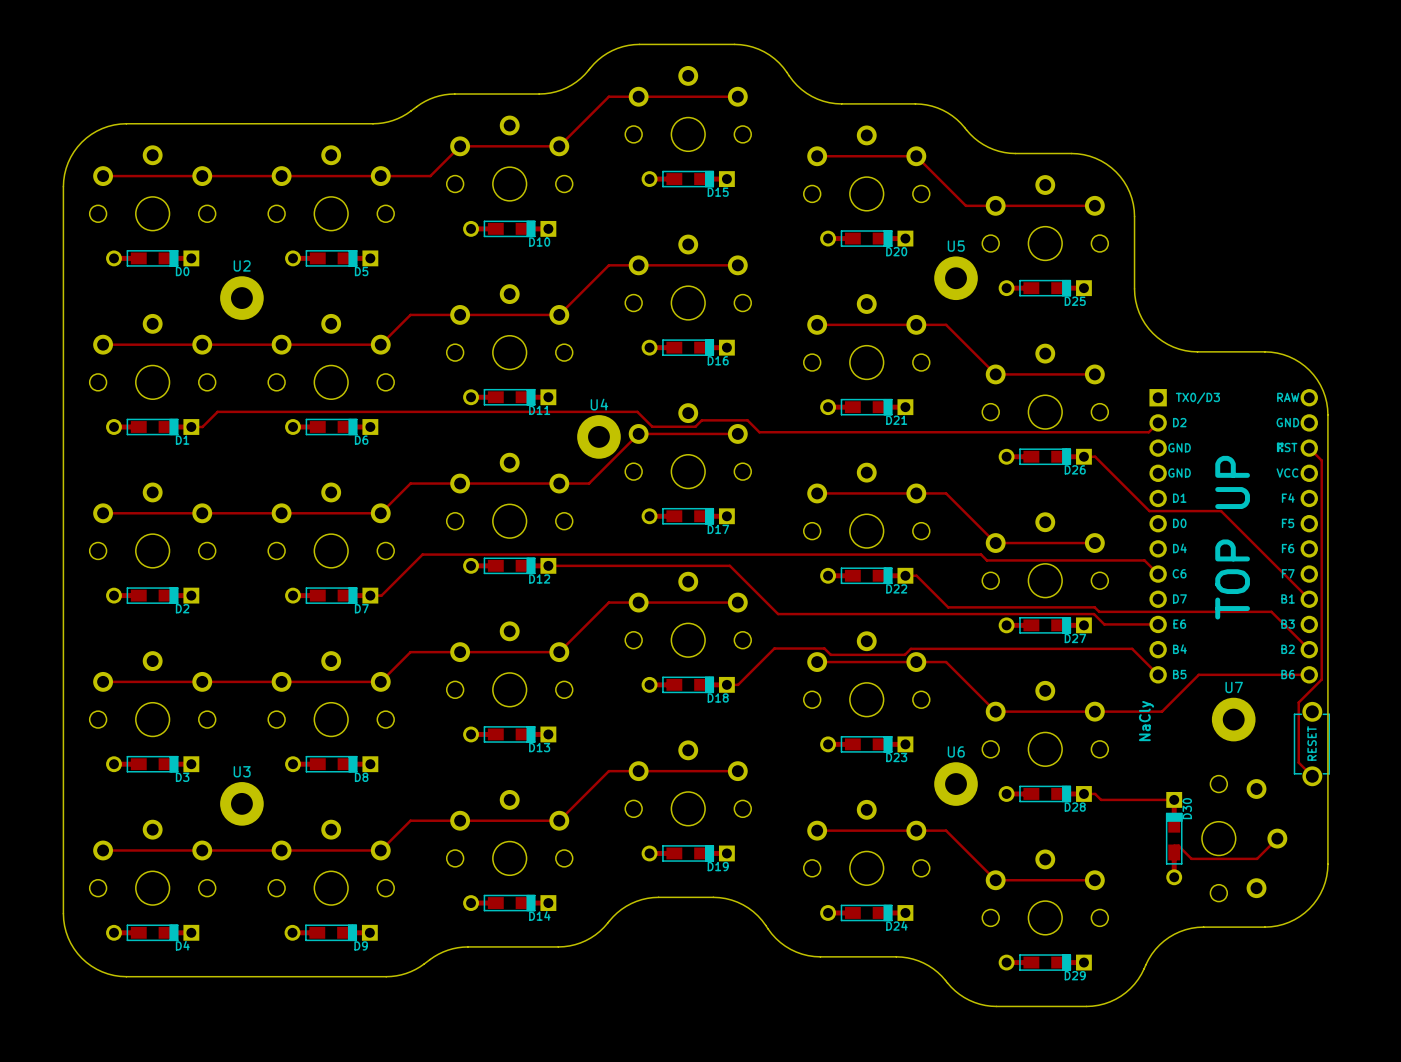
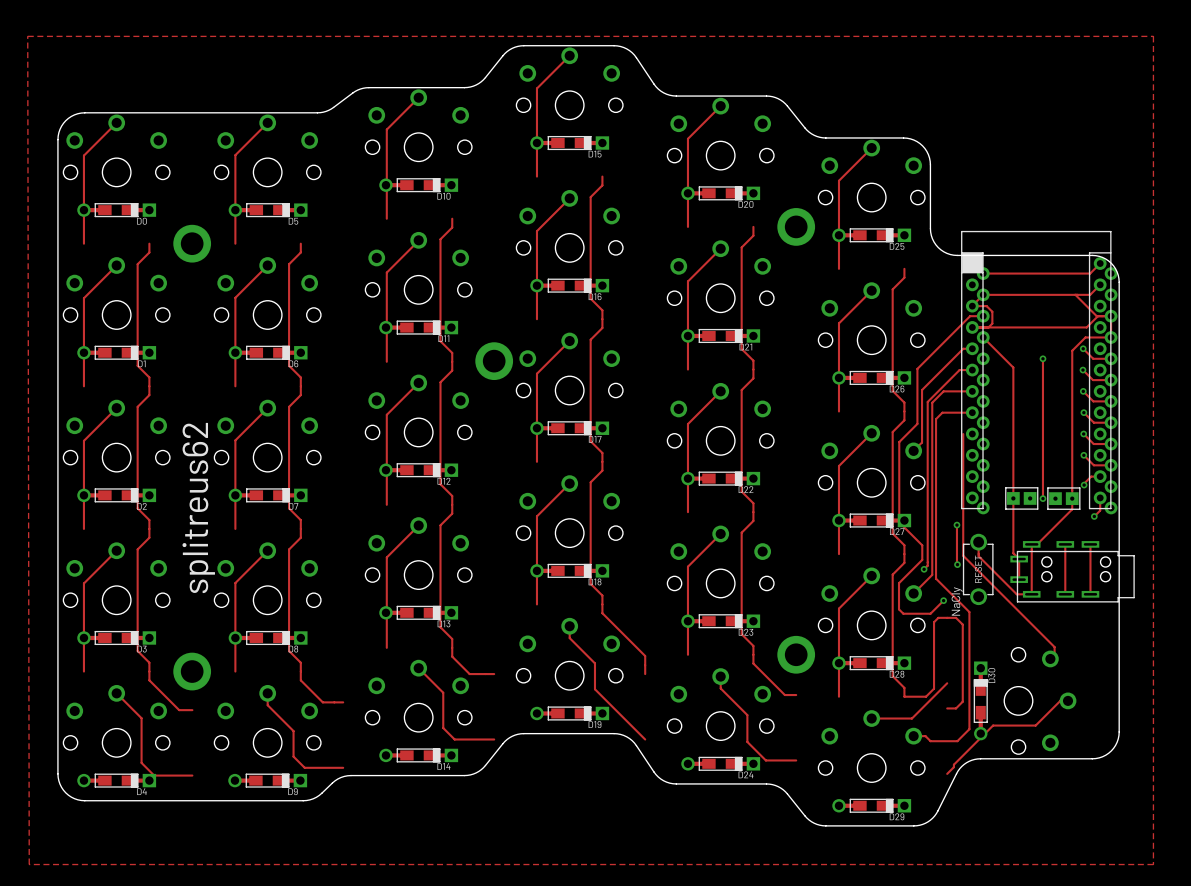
board edge: (734, 44) (752, 47) (769, 55) (783, 67) (797, 85) (817, 99) (835, 103) (915, 103) (932, 106) (952, 115) (983, 144) (998, 151) (1015, 153) -> none
board edge: (734, 44) (628, 45) (607, 53) (576, 82) (556, 91) (539, 94) (444, 94) (430, 99) (402, 116) (383, 122) (114, 124) (91, 134) (77, 146) (66, 168) (63, 186) -> none
zone outline: none -> (27, 36) (1153, 36) (1153, 864) (29, 864) (27, 36)
board edge: none -> (523, 45) (620, 46) (634, 55) (655, 86) (666, 94) (676, 96) (772, 96) (785, 103) (806, 130) (817, 136) (903, 137) (913, 140) (924, 148) (929, 157) (930, 232) (934, 242) (943, 251) (957, 255) (1095, 255) (1105, 259) (1113, 265) (1119, 282) (1119, 731) (1115, 745) (1108, 753) (1092, 758) (971, 760) (958, 771) (934, 816) (925, 823) (913, 825) (817, 824) (806, 818) (785, 791) (772, 784) (669, 783) (655, 774) (632, 740) (623, 735) (614, 733) (517, 734) (504, 741) (483, 767) (473, 774) (347, 775) (335, 780) (316, 797) (306, 800) (84, 800) (71, 797) (63, 790) (57, 773) (57, 139) (61, 126) (71, 116) (81, 113) (320, 112) (331, 109) (355, 91) (363, 88) (470, 86) (483, 79) (507, 51) (515, 47) (523, 45)
track: none -> (569, 55) (536, 88) (536, 176)
track: (737, 96) (608, 96) (559, 146) (460, 146) (430, 176) (103, 176) -> none
track: none -> (418, 97) (386, 129) (386, 218)
track: none -> (720, 106) (687, 138) (687, 226)
board edge: (1015, 153) (1083, 154) (1101, 160) (1116, 171) (1127, 186) (1133, 204) (1134, 295) (1139, 312) (1148, 328) (1162, 341) (1179, 349) (1197, 351) -> none
track: none -> (116, 122) (83, 155) (83, 243)
track: none -> (267, 122) (235, 155) (235, 243)
track: (817, 156) (916, 156) (965, 205) (1094, 205) -> none
track: none -> (871, 148) (838, 180) (838, 268)
board edge: (63, 186) (63, 913) (68, 937) (77, 953) (86, 962) (102, 971) (120, 976) (391, 976) (406, 973) (424, 964) -> none
track: none -> (602, 176) (602, 185) (590, 197) (590, 298) (602, 310) (602, 328) (590, 339) (590, 441) (602, 453) (602, 470) (590, 482) (590, 583) (602, 595) (602, 613) (645, 656) (645, 674)
track: none -> (569, 198) (536, 231) (536, 319)
track: (737, 265) (608, 265) (559, 314) (410, 314) (380, 344) (103, 344) -> none
track: none -> (452, 218) (452, 227) (440, 239) (440, 341) (452, 352) (452, 370) (440, 382) (440, 484) (452, 496) (452, 513) (440, 525) (440, 627) (452, 639) (452, 656) (469, 674) (494, 674)
track: none -> (753, 226) (753, 235) (741, 247) (741, 348) (753, 360) (753, 378) (741, 390) (741, 491) (753, 503) (753, 520) (741, 532) (741, 634) (753, 645) (753, 663) (784, 695) (796, 695)
U5: (956, 278) -> none
part: none -> (796, 226)
track: none -> (418, 240) (386, 272) (386, 361)
track: none -> (149, 243) (149, 252) (137, 264) (137, 365) (149, 377) (149, 395) (137, 406) (137, 508) (149, 520) (149, 537) (137, 549) (137, 650) (149, 662) (149, 680) (179, 710) (192, 710)
U2: (241, 298) -> none
part: none -> (192, 243)
track: none -> (300, 243) (300, 252) (289, 264) (289, 365) (300, 377) (300, 395) (289, 406) (289, 508) (300, 520) (300, 537) (289, 549) (289, 650) (300, 662) (300, 680) (322, 702) (343, 702)
track: none -> (720, 248) (687, 281) (687, 369)
track: none -> (1100, 263) (1090, 273) (983, 273)
track: none -> (116, 265) (83, 298) (83, 386)
track: none -> (267, 265) (235, 297) (235, 386)
track: (817, 324) (946, 324) (995, 374) (1094, 374) -> none
track: none -> (904, 268) (904, 277) (892, 289) (892, 390) (904, 402) (904, 420) (892, 432) (892, 533) (904, 545) (904, 562) (892, 574) (892, 676) (904, 687) (904, 696) (926, 696) (934, 688) (934, 622) (938, 617) (956, 617) (962, 624) (962, 701) (956, 708) (947, 708)
track: none -> (1100, 284) (1090, 294) (983, 294) (972, 306) (986, 306) (992, 311) (992, 323) (988, 327)
board edge: (1197, 351) (1264, 351) -> none
board edge: (1264, 351) (1289, 356) (1309, 370) (1320, 385) (1327, 408) (1327, 864) (1325, 882) (1317, 899) (1299, 916) (1277, 925) (1197, 927) (1174, 934) (1155, 949) (1138, 979) (1125, 992) (1110, 1001) (1092, 1006) (985, 1005) (964, 997) (933, 968) (913, 959) (896, 956) (820, 956) -> none
track: none -> (871, 290) (838, 323) (838, 411)
track: none -> (1075, 294) (1096, 316) (1111, 316) (1111, 337) (1085, 337) (1072, 350) (1072, 509) (1037, 544) (1031, 544) (1031, 594) (1016, 594) (978, 556) (978, 542)
track: none -> (983, 316) (970, 316) (917, 368) (917, 423) (899, 442) (899, 522) (922, 545) (922, 559) (899, 583) (899, 609) (903, 613) (930, 613) (943, 600)
track: none -> (1097, 316) (1086, 327) (972, 327)
track: none -> (983, 337) (1013, 367) (1013, 553) (1019, 559) (1019, 579)
track: none -> (569, 341) (536, 373) (536, 461)
track: (1158, 422) (1148, 432) (759, 432) (747, 420) (701, 420) (695, 426) (652, 426) (637, 411) (217, 411) (202, 427) (166, 427) -> none
track: none -> (1083, 348) (1093, 358) (1111, 358)
via: none -> (1083, 348)
track: (737, 433) (638, 433) (589, 483) (410, 483) (380, 513) (103, 513) -> none
track: none -> (1042, 358) (1042, 498)
via: none -> (1042, 358)
U4: (598, 436) -> none
part: none -> (494, 361)
track: none -> (972, 370) (959, 370) (927, 401) (927, 565) (924, 569)
track: none -> (1082, 370) (1093, 380) (1111, 380)
via: none -> (1082, 370)
track: (1309, 448) (1321, 460) (1321, 679) (1298, 702) (1298, 762) (1312, 776) -> none
part: none -> (1039, 372)
track: (1059, 456) (1095, 456) (1149, 511) (1221, 511) (1309, 599) -> none
track: none -> (418, 382) (386, 414) (386, 504)
track: none -> (720, 391) (687, 424) (687, 512)
track: none -> (972, 391) (943, 391) (932, 402) (932, 574) (913, 593)
track: none -> (1083, 391) (1093, 401) (1111, 401)
via: none -> (1083, 391)
track: none -> (116, 408) (83, 440) (83, 528)
track: none -> (267, 408) (235, 440) (235, 528)
track: (817, 493) (946, 493) (995, 543) (1094, 543) -> (972, 348) (963, 348) (922, 390) (922, 442) (913, 450)
track: none -> (1083, 412) (1093, 422) (1111, 422)
via: none -> (1083, 412)
track: none -> (871, 433) (838, 466) (838, 554)
track: none -> (963, 434) (963, 555) (1054, 647) (1054, 658)
track: none -> (1083, 433) (1093, 444) (1111, 444)
via: none -> (1083, 433)
part: (1233, 536) -> none
track: none -> (1083, 455) (1093, 465) (1111, 465)
via: none -> (1083, 455)
track: (523, 565) (729, 565) (778, 614) (1094, 614) (1104, 624) (1158, 624) -> none
track: none -> (1100, 476) (1091, 476) (1084, 485)
track: (1158, 574) (1144, 560) (986, 560) (981, 554) (422, 554) (381, 595) (345, 595) -> none
track: (880, 575) (916, 575) (948, 607) (1094, 607) (1099, 611) (1271, 611) (1309, 649) -> none
track: none -> (569, 483) (536, 516) (536, 604)
via: none -> (1084, 485)
track: none -> (1100, 497) (1100, 510) (1094, 516)
part: none -> (1021, 498)
via: none -> (1042, 498)
part: none -> (1063, 498)
track: (737, 602) (608, 602) (559, 652) (410, 652) (380, 681) (103, 681) -> none
text: none -> splitreus62 (198, 507)
via: none -> (1094, 516)
track: none -> (956, 525) (957, 564)
via: none -> (956, 525)
track: none -> (418, 525) (386, 557) (386, 647)
track: none -> (720, 533) (687, 566) (687, 654)
track: none -> (1065, 544) (1065, 594)
track: none -> (1090, 544) (1090, 594)
track: none -> (116, 550) (83, 583) (83, 671)
track: none -> (267, 550) (235, 583) (235, 671)
track: (817, 662) (946, 662) (995, 711) (1162, 711) (1198, 674) (1309, 674) -> none
track: (1158, 674) (1132, 648) (910, 648) (904, 654) (830, 654) (824, 648) (774, 648) (738, 684) (702, 684) -> none
via: none -> (957, 564)
via: none -> (924, 569)
part: none -> (1072, 571)
track: none -> (871, 575) (838, 608) (838, 696)
U7: (1233, 719) -> none
via: none -> (943, 600)
part position: (1311, 744) -> (978, 569)
track: none -> (569, 626) (569, 638) (594, 663) (594, 689) (645, 739)
track: (737, 771) (608, 771) (559, 820) (410, 820) (380, 850) (103, 850) -> none
U6: (956, 784) -> none
part: none -> (796, 654)
track: (1059, 793) (1095, 793) (1101, 799) (1174, 799) (1174, 824) -> none
track: none -> (418, 668) (443, 692) (443, 728) (454, 739) (494, 739)
U3: (241, 803) -> none
part: none -> (192, 671)
track: none -> (720, 676) (720, 688) (747, 715) (747, 741) (765, 760) (796, 760)
track: none -> (947, 683) (911, 718) (871, 718)
track: none -> (116, 693) (141, 718) (141, 762) (154, 775) (192, 775)
track: none -> (267, 693) (267, 705) (293, 731) (293, 756) (304, 767) (343, 767)
track: (817, 830) (946, 830) (995, 880) (1094, 880) -> (972, 412) (942, 412) (936, 419) (936, 578) (969, 612) (969, 729) (957, 741) (930, 741) (925, 736) (913, 736)
track: (1277, 838) (1257, 858) (1191, 858) (1178, 845) (1174, 845) (1174, 877) -> none
track: none -> (1072, 700) (1060, 700) (1035, 725) (993, 725) (947, 773)
board edge: (820, 956) (802, 954) (785, 946) (771, 933) (757, 915) (737, 902) (719, 897) (658, 897) (641, 899) (626, 906) (595, 934) (575, 944) (558, 946) (462, 947) (447, 950) (430, 959) -> none
board edge: (430, 959) (424, 964) -> none

